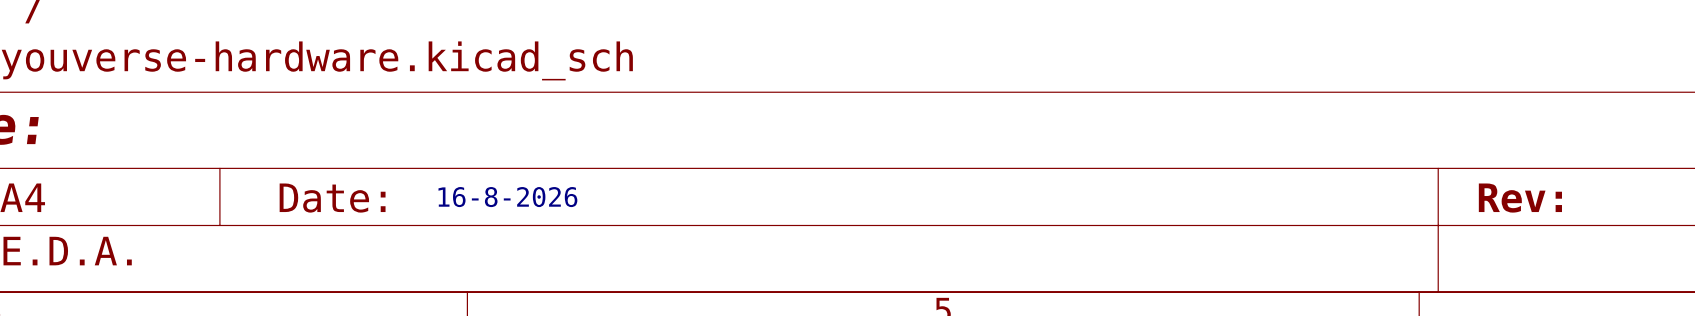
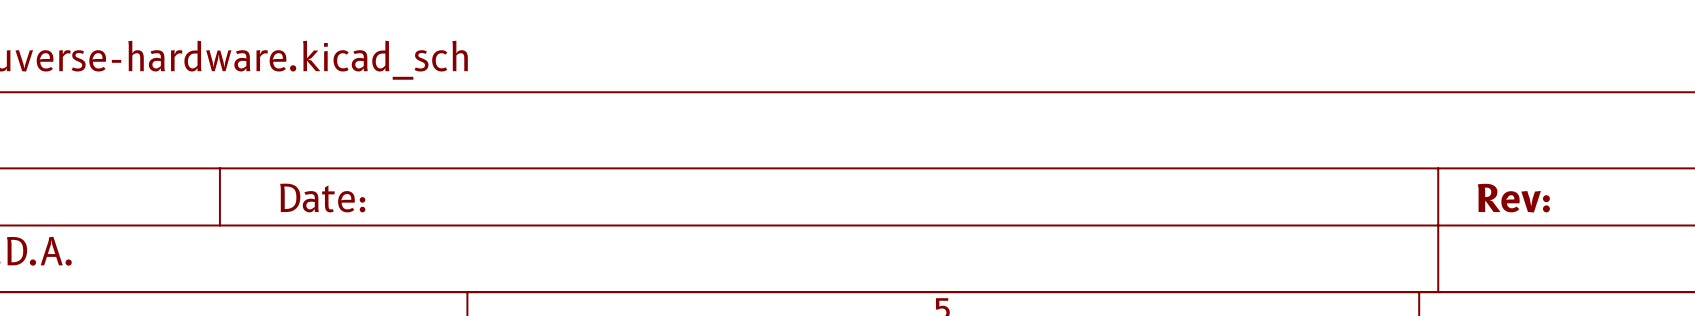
text: 16-8-2026 (507, 197) -> none

